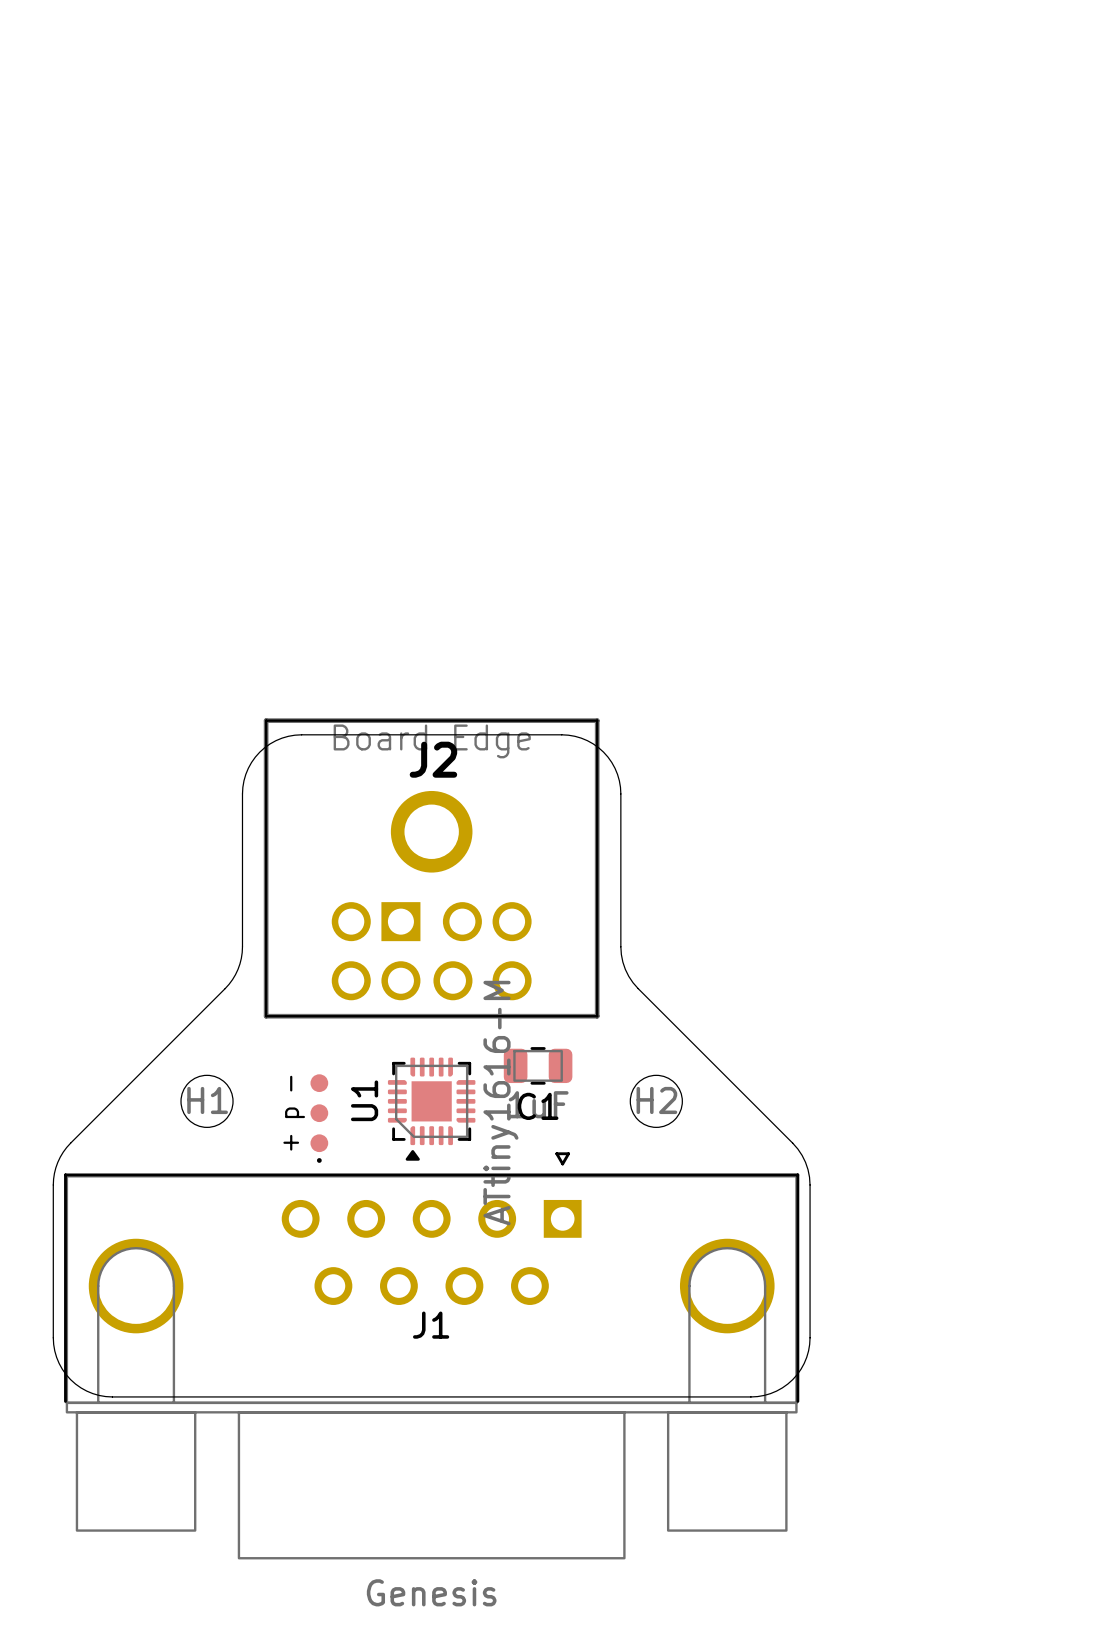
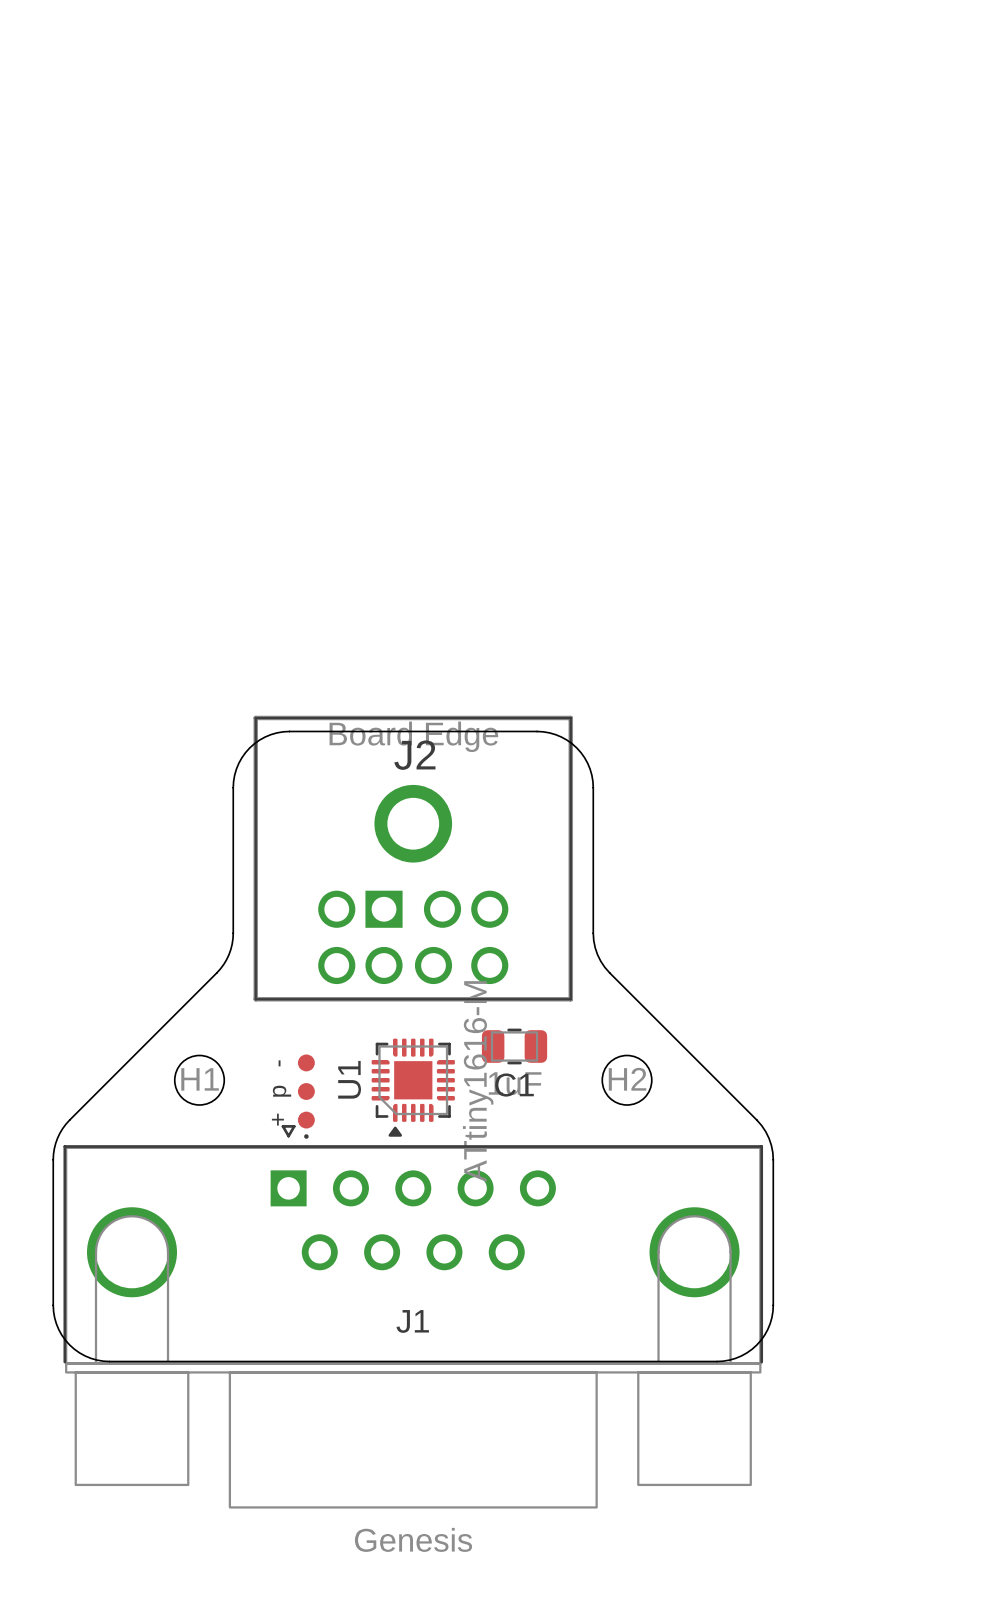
J1 footprint: [64, 1152, 800, 1560] -> [63, 1125, 764, 1509]

